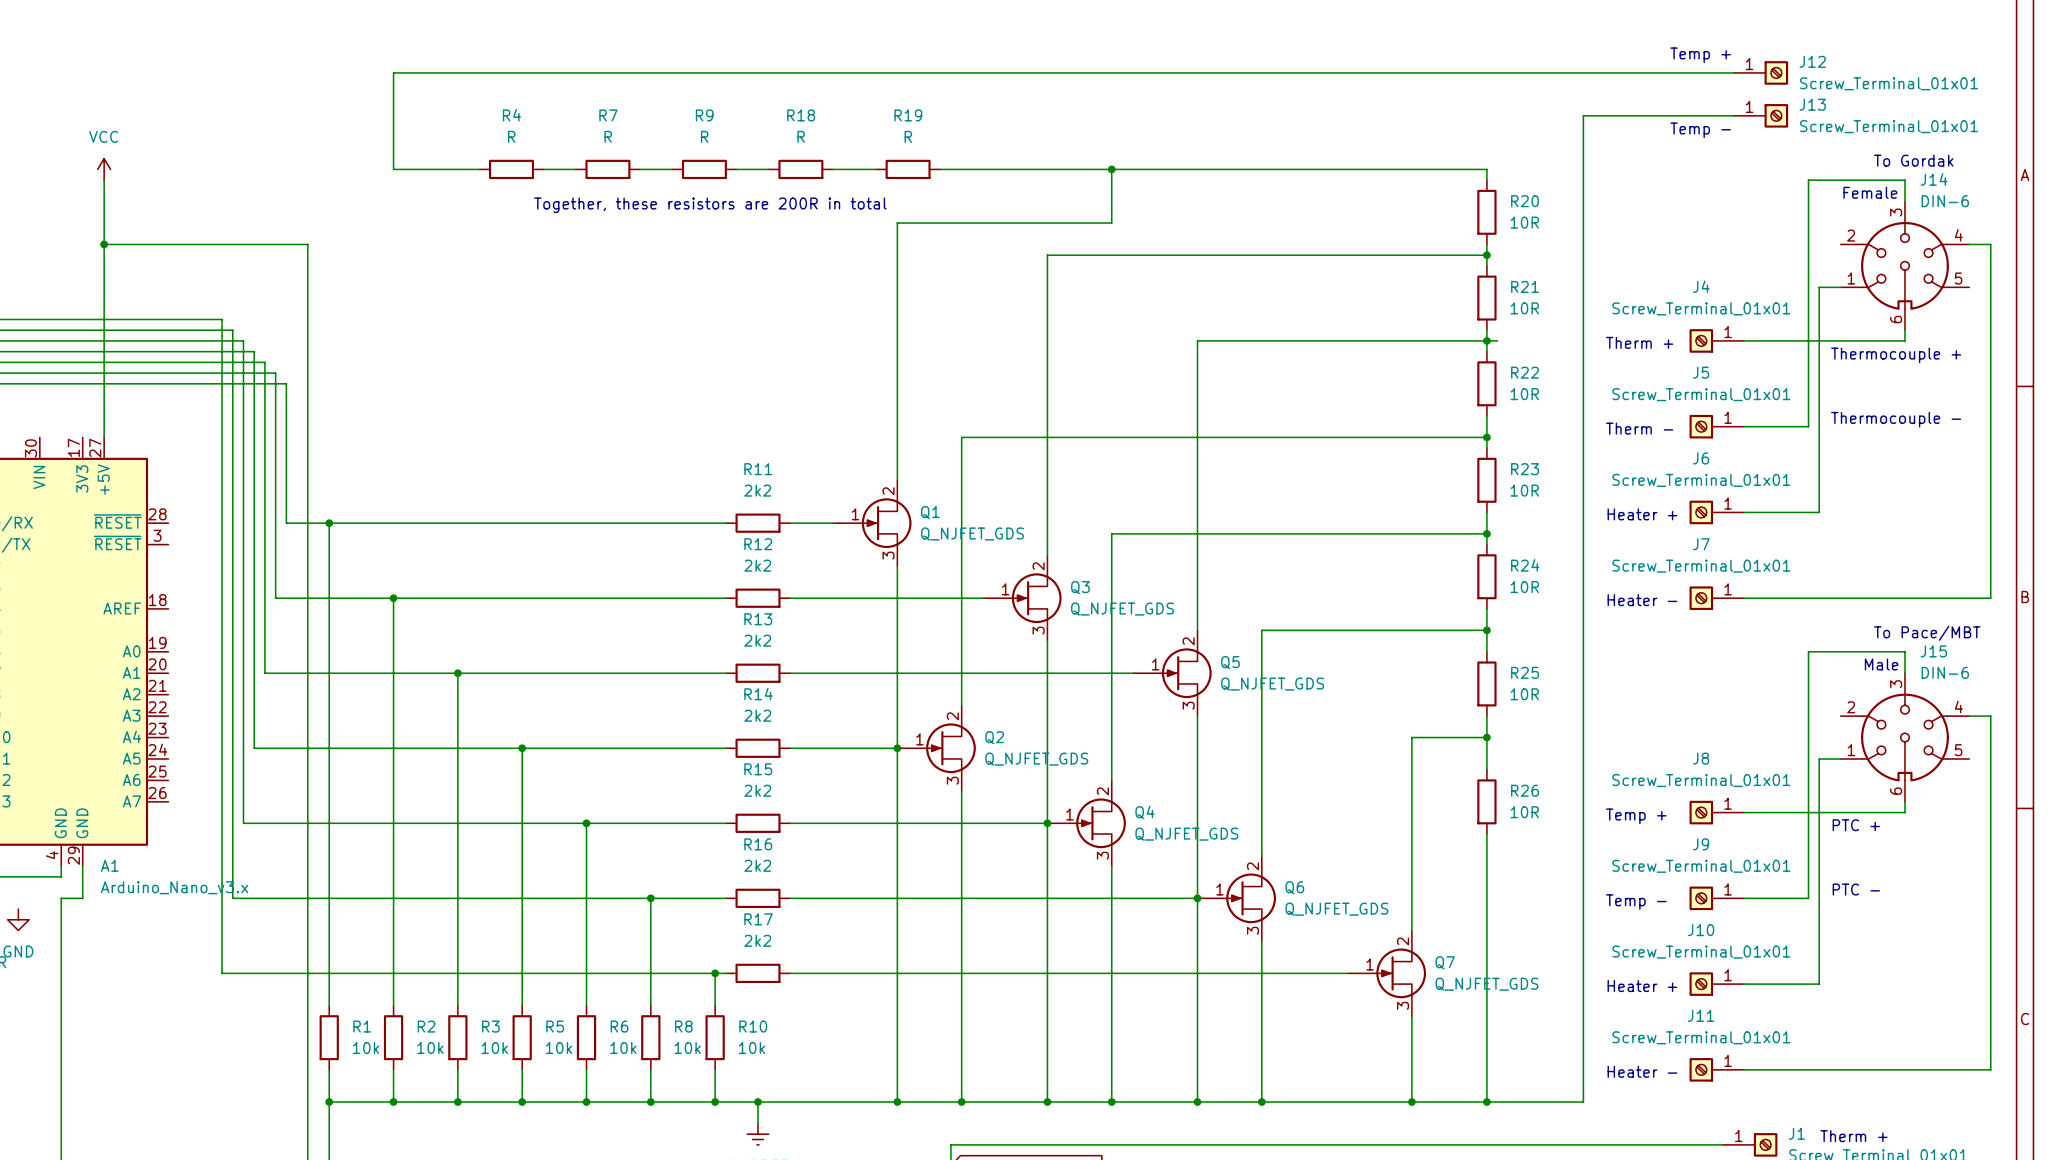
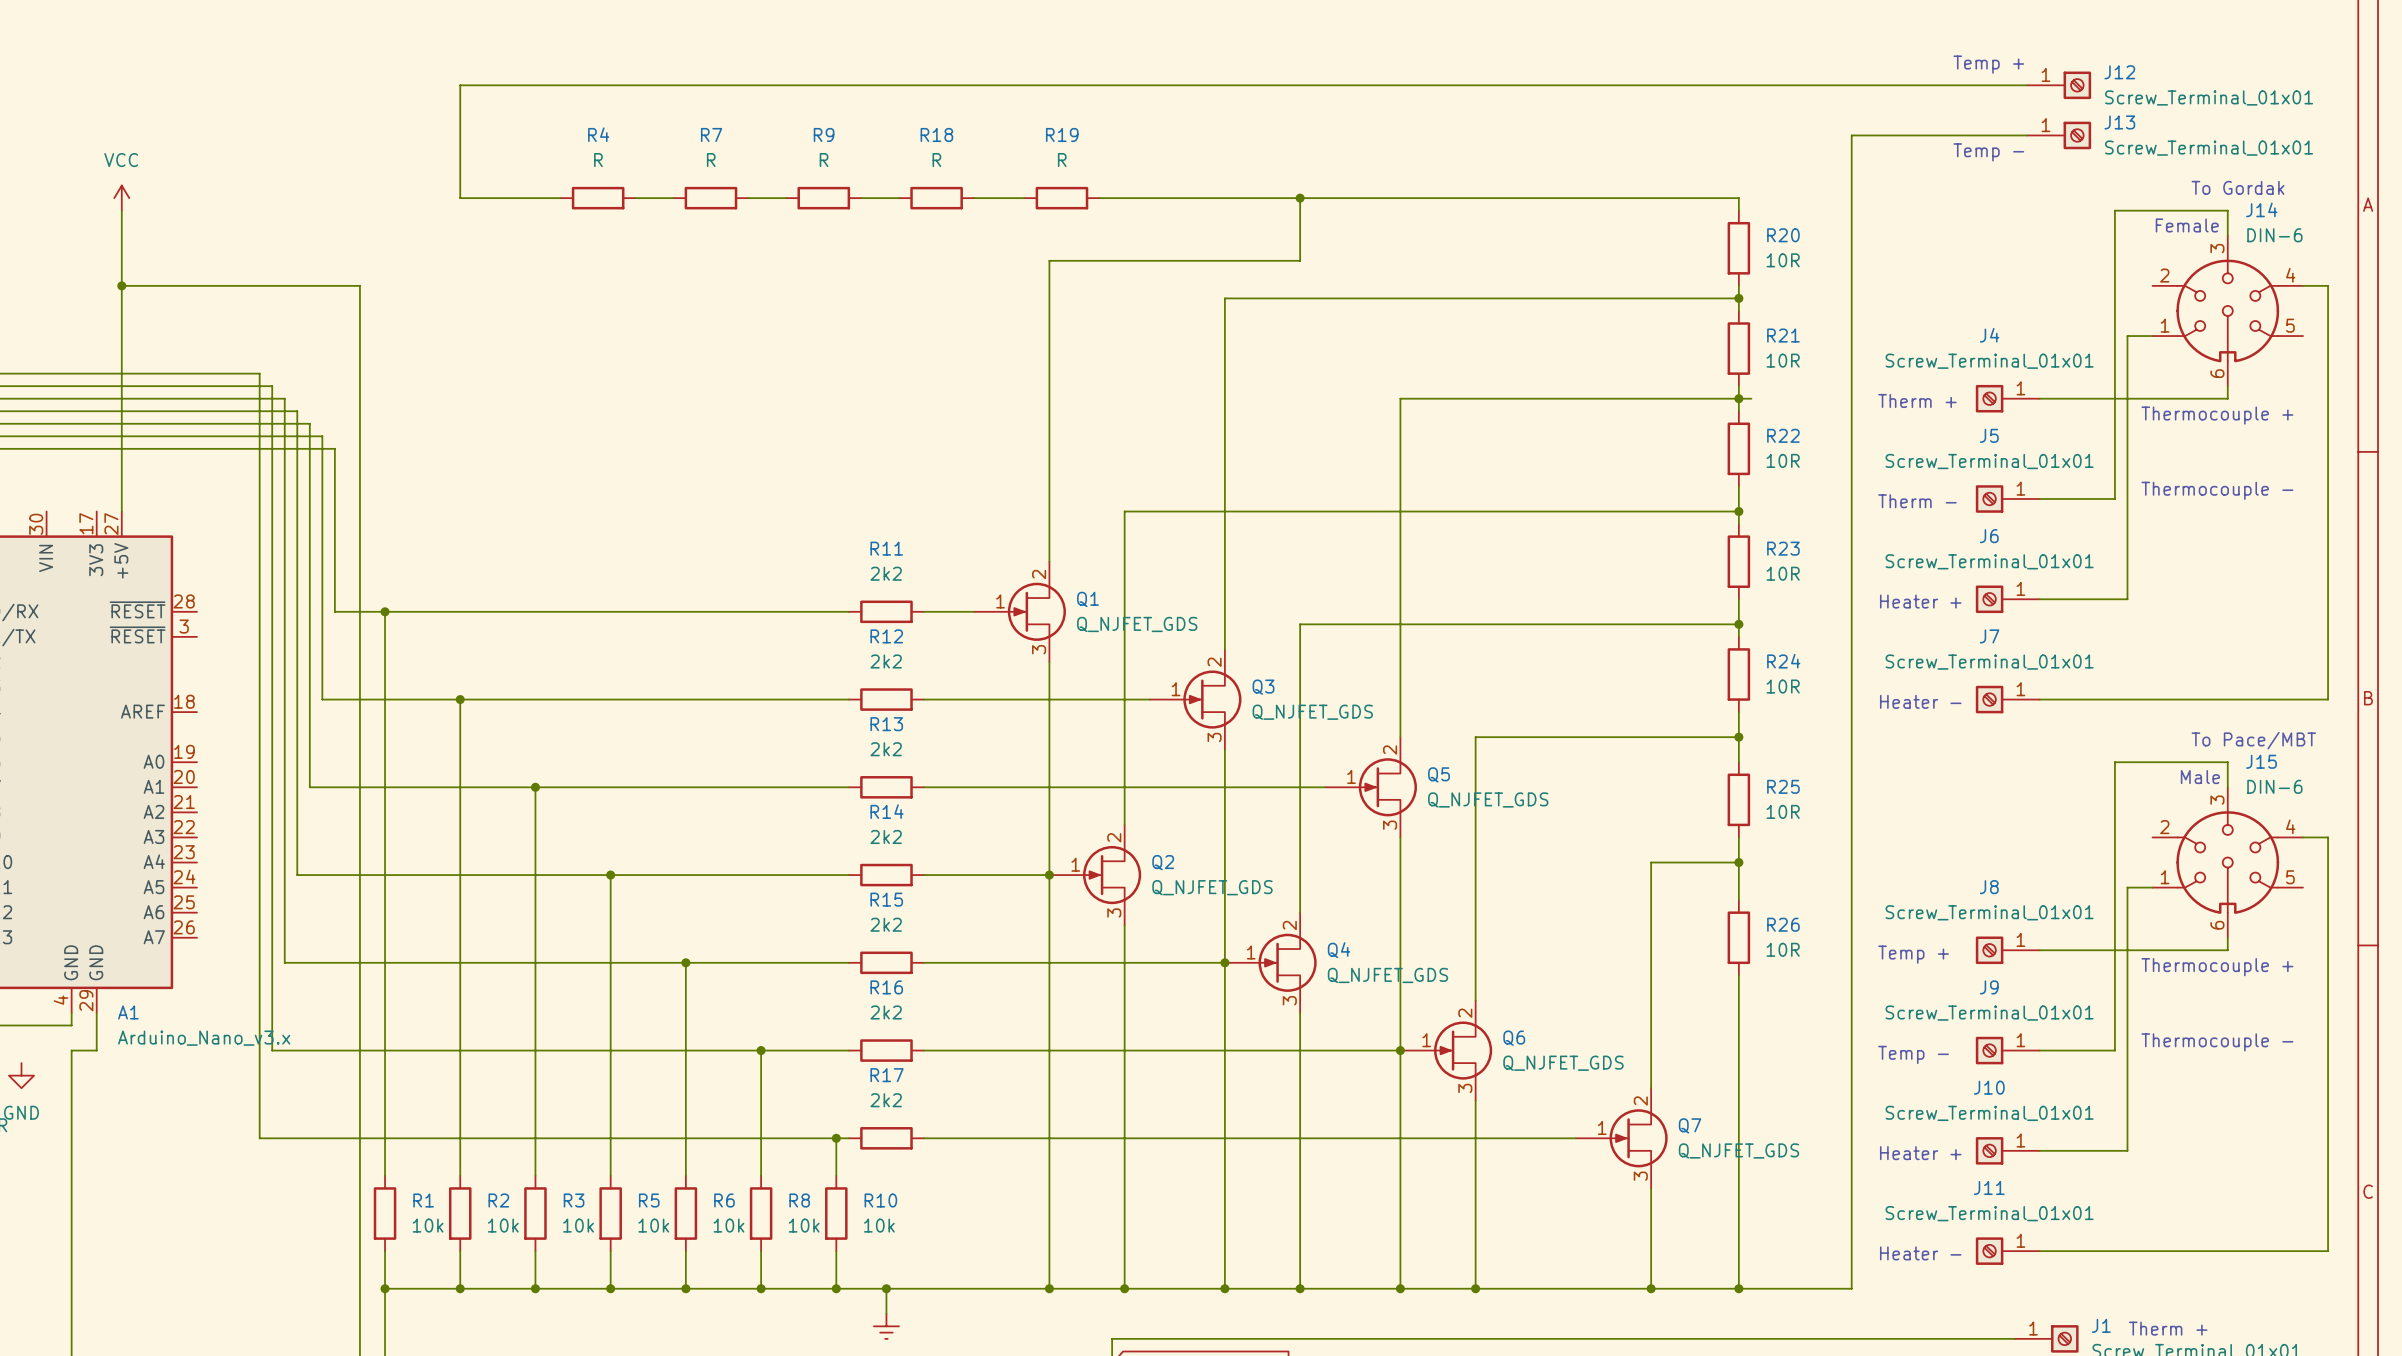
text: Together, these resistors are 200R in total (710, 205) -> none
text: PTC + (1856, 825) -> Thermocouple + (2217, 967)
text: PTC - (1856, 889) -> Thermocouple - (2217, 1042)

